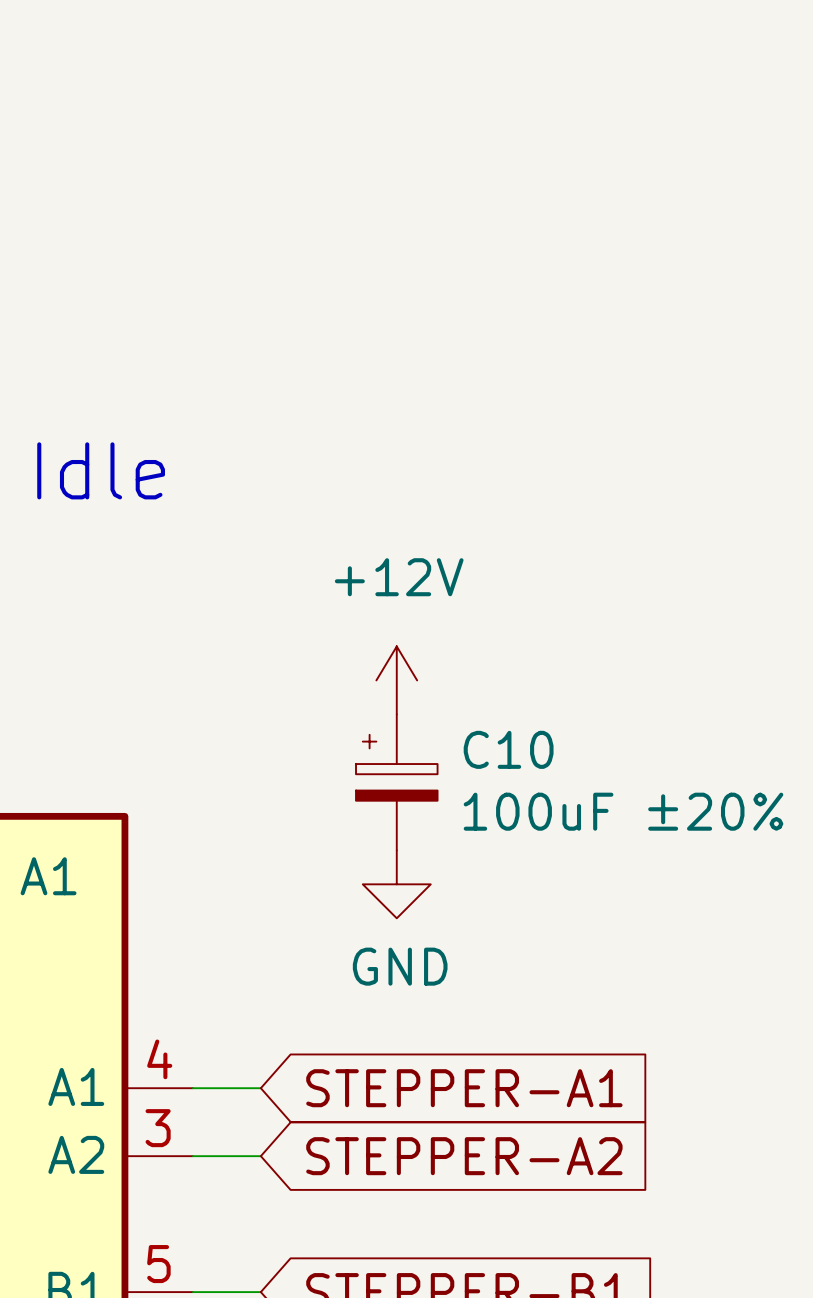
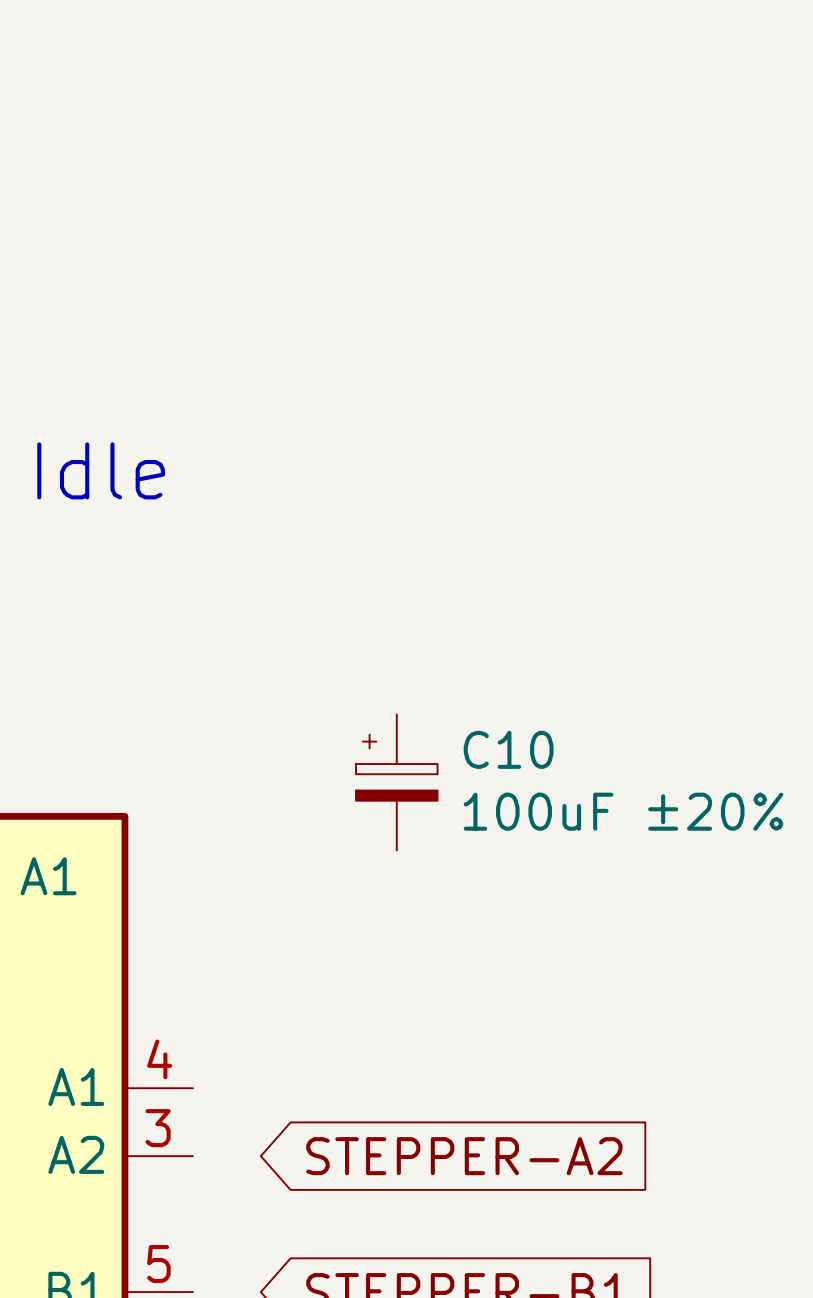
power symbol: +12V (396, 680) -> none
power symbol: GND (396, 884) -> none
wire: (192, 1088) (260, 1088) -> none
global label: STEPPER-A1 (464, 1088) -> none
wire: (192, 1156) (260, 1156) -> none
wire: (192, 1292) (260, 1292) -> none

